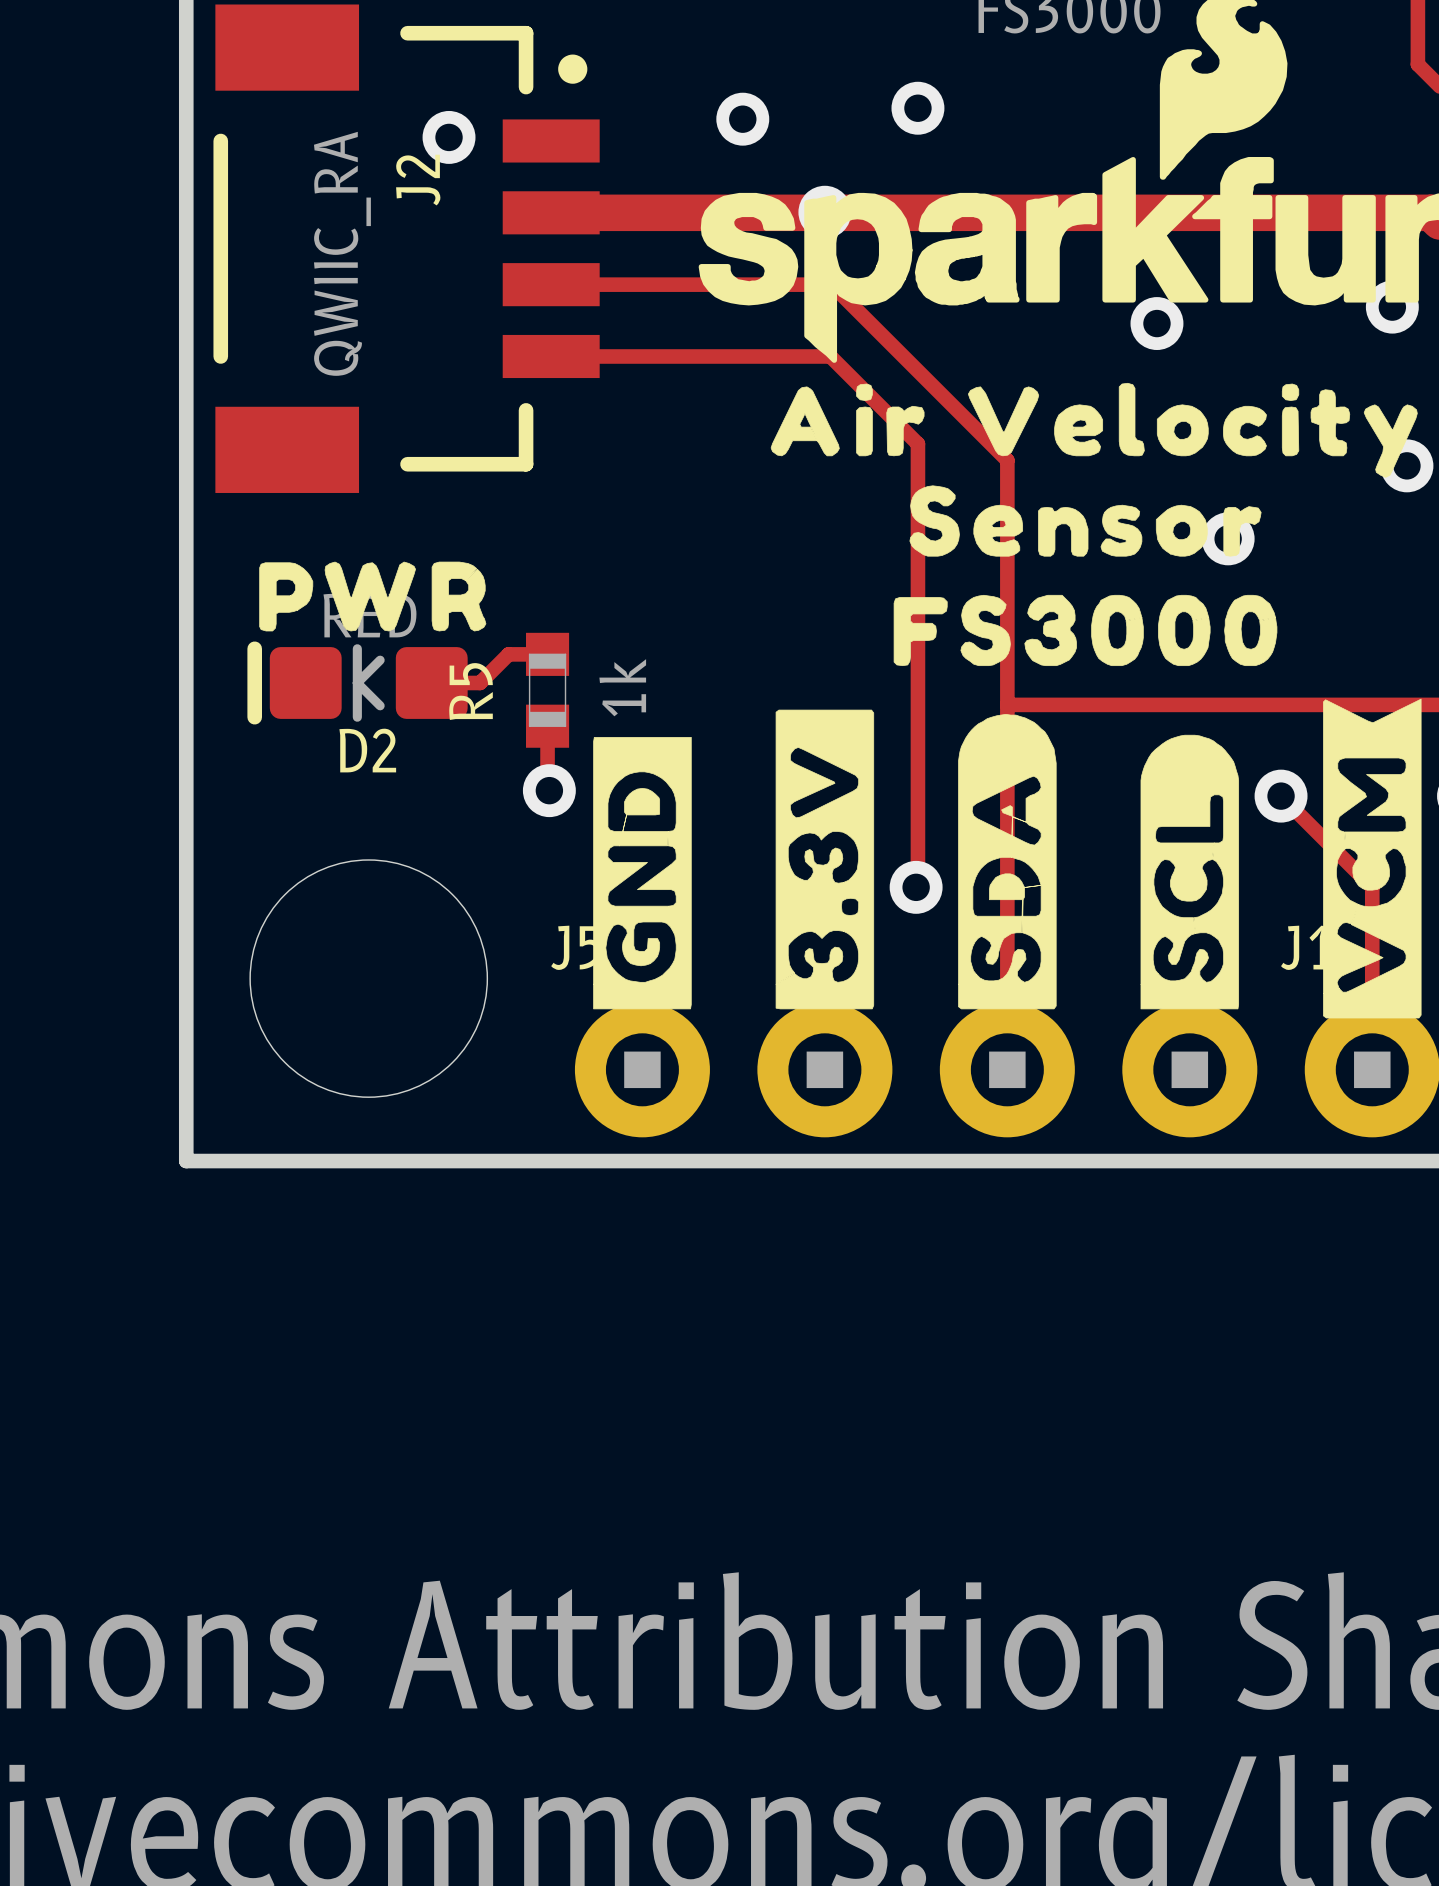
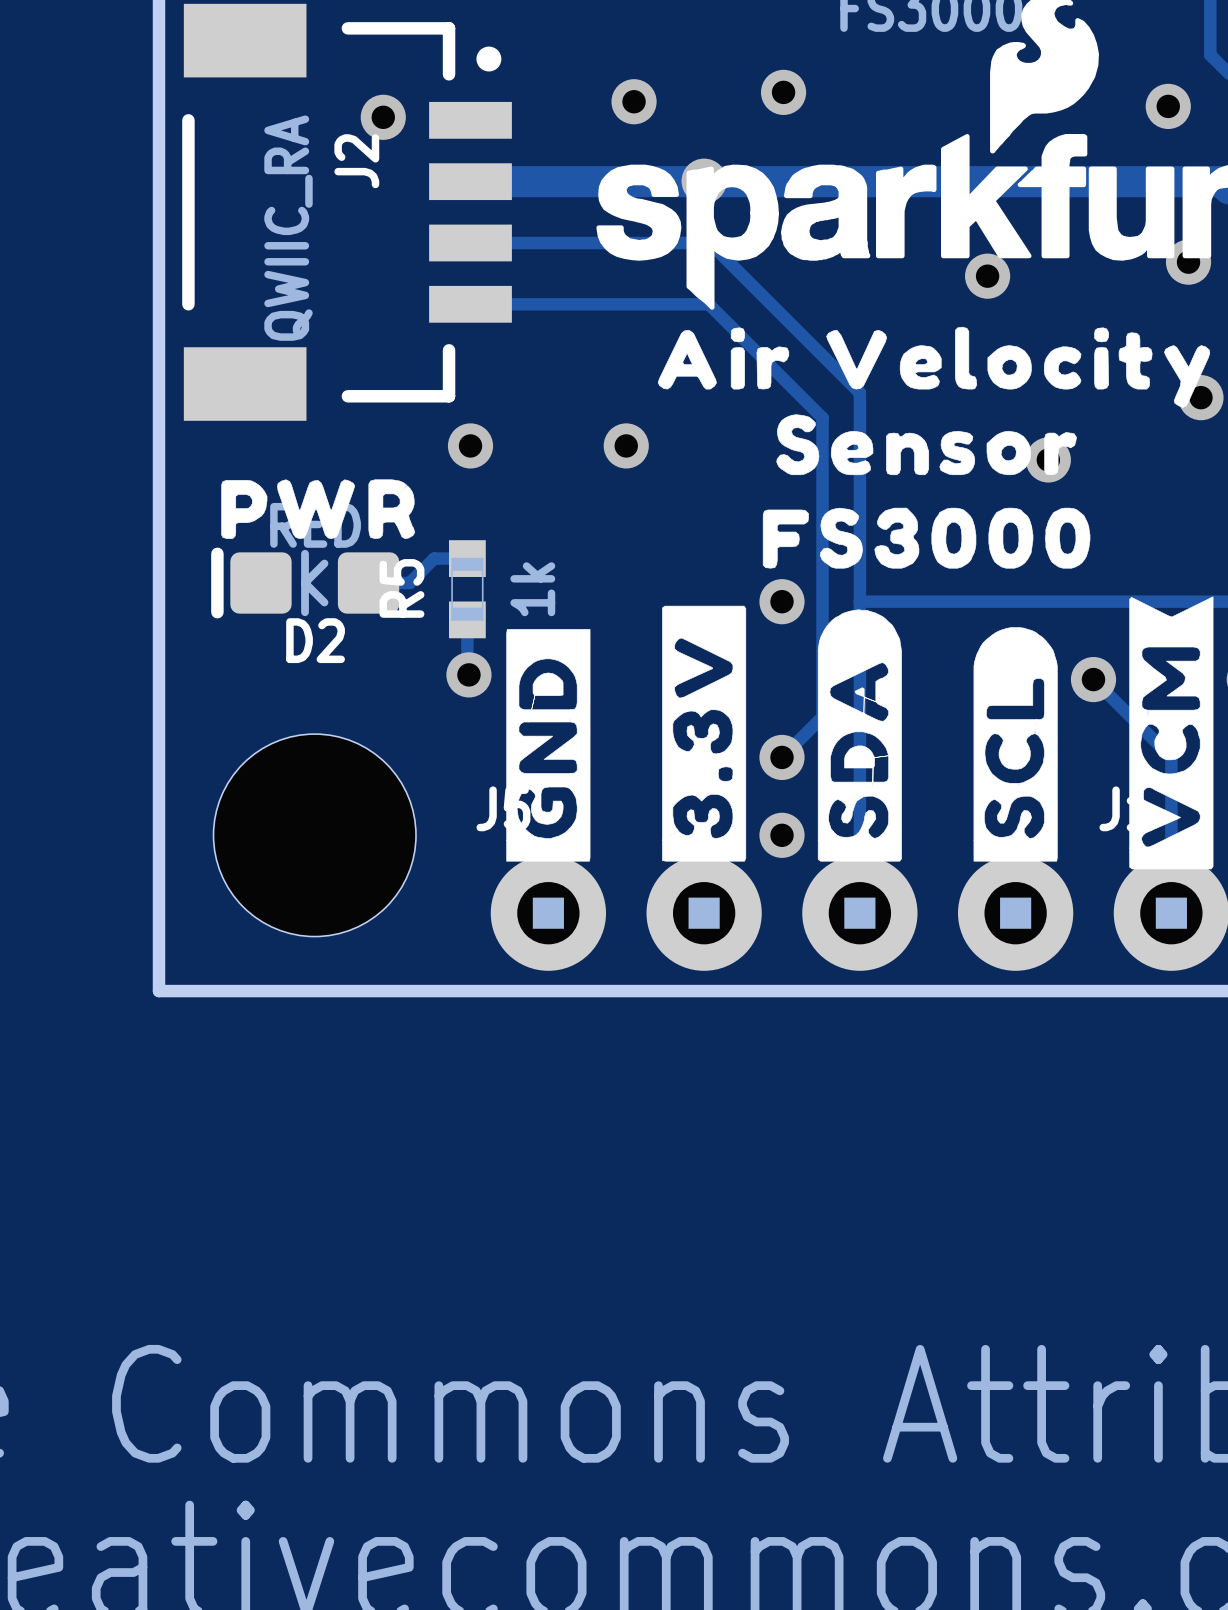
via: none -> (1168, 106)
track: (917, 443) (917, 885) -> (783, 378) (822, 417) (822, 716) (783, 755)
via: none -> (470, 445)
via: none -> (626, 445)
via: none -> (782, 601)
via: none -> (782, 835)

